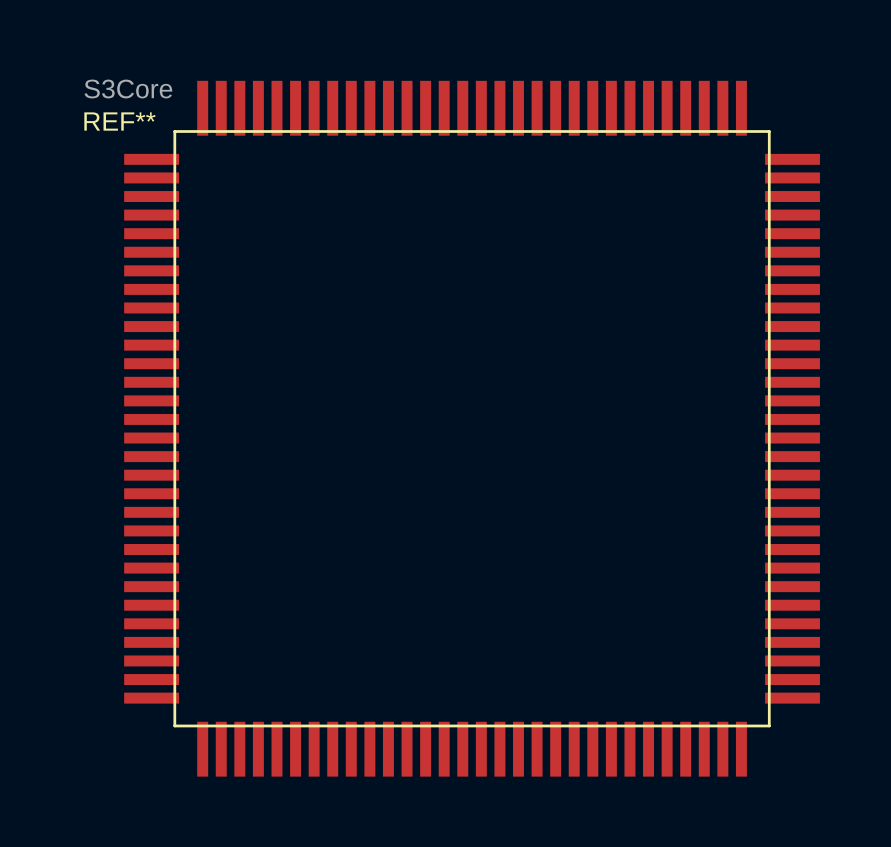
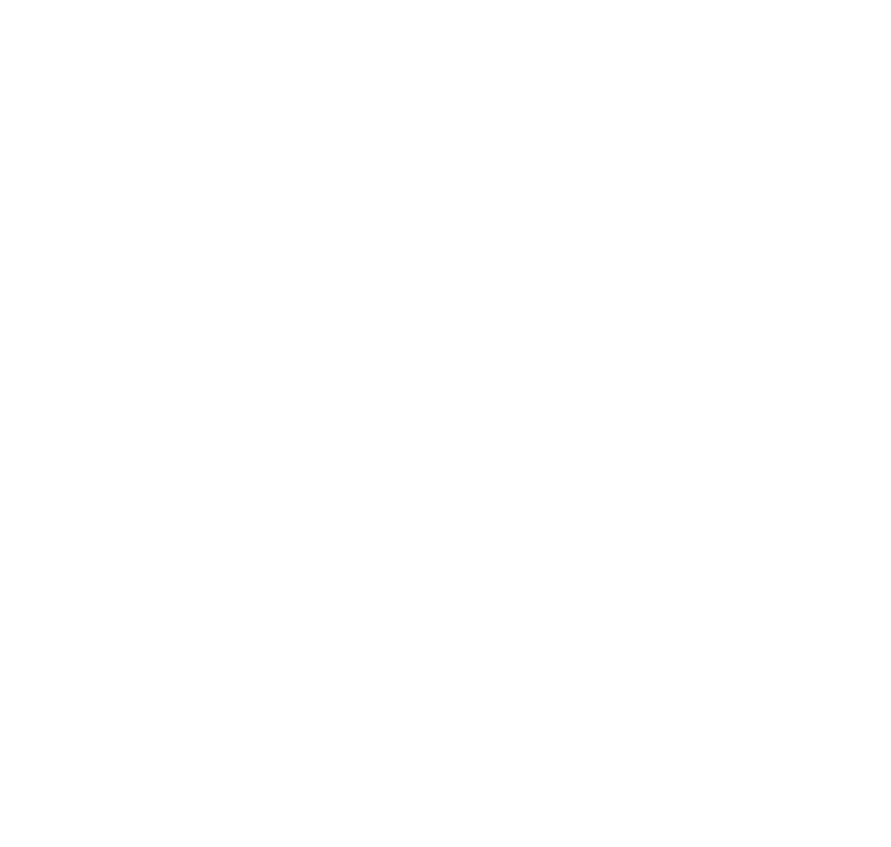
REF**: S3Core (472, 428) -> none

